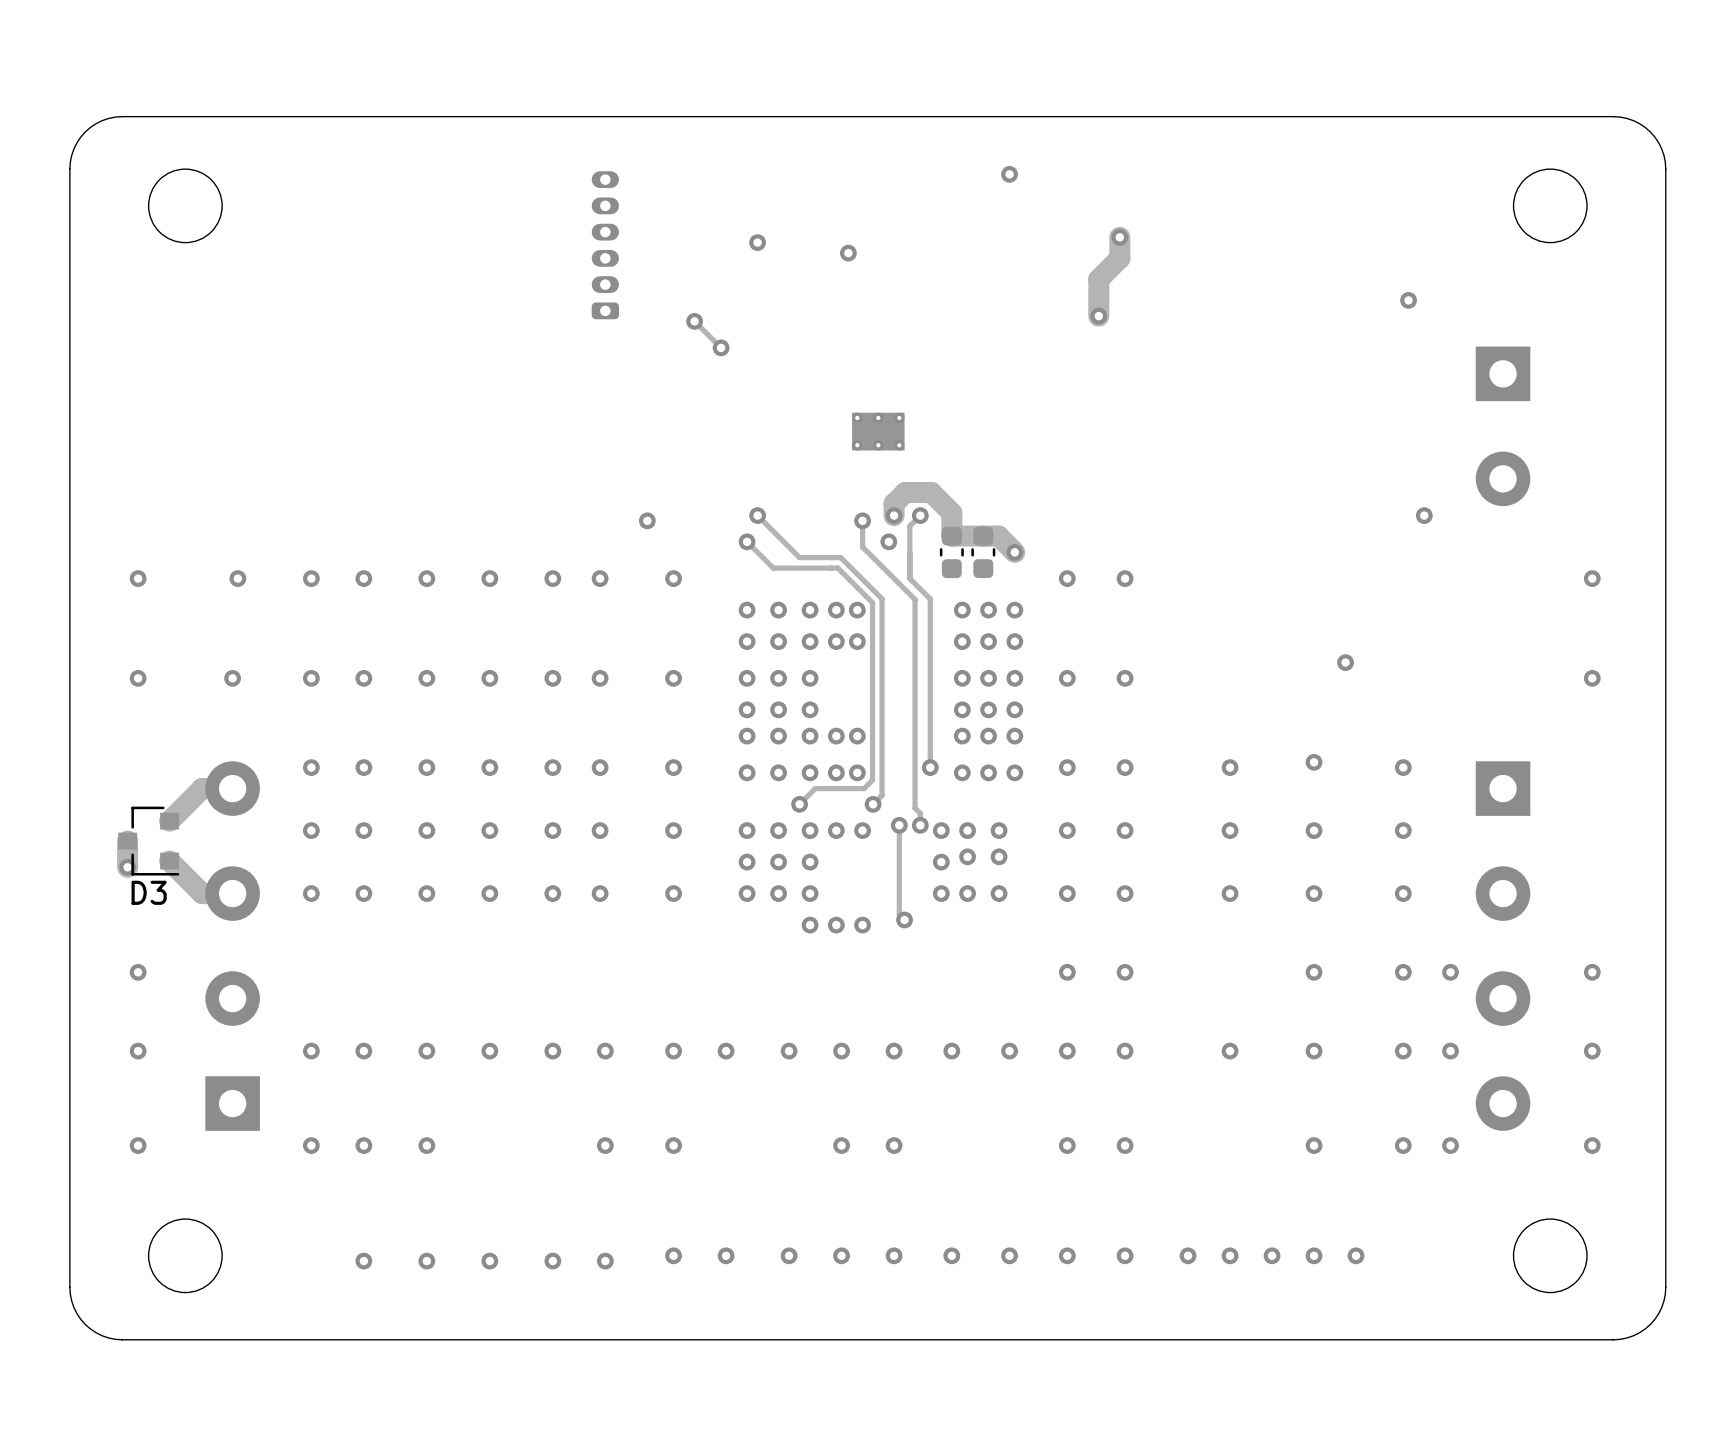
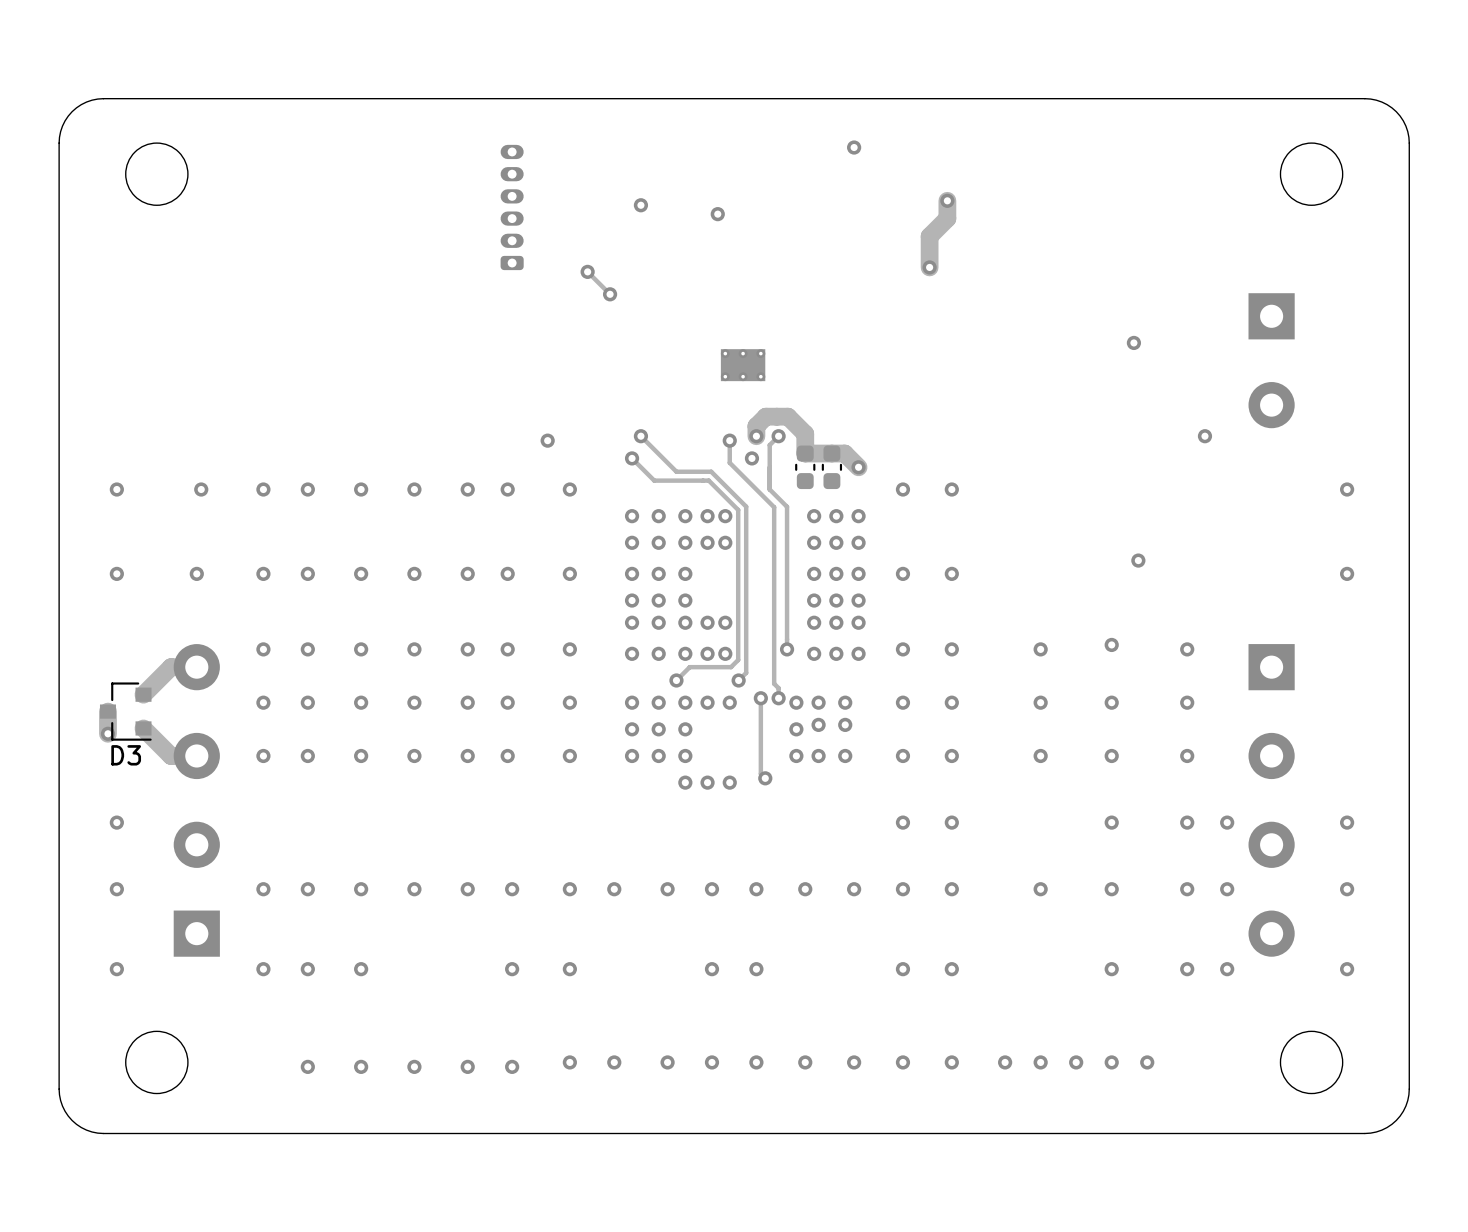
via position: (1408, 300) -> (1133, 342)

